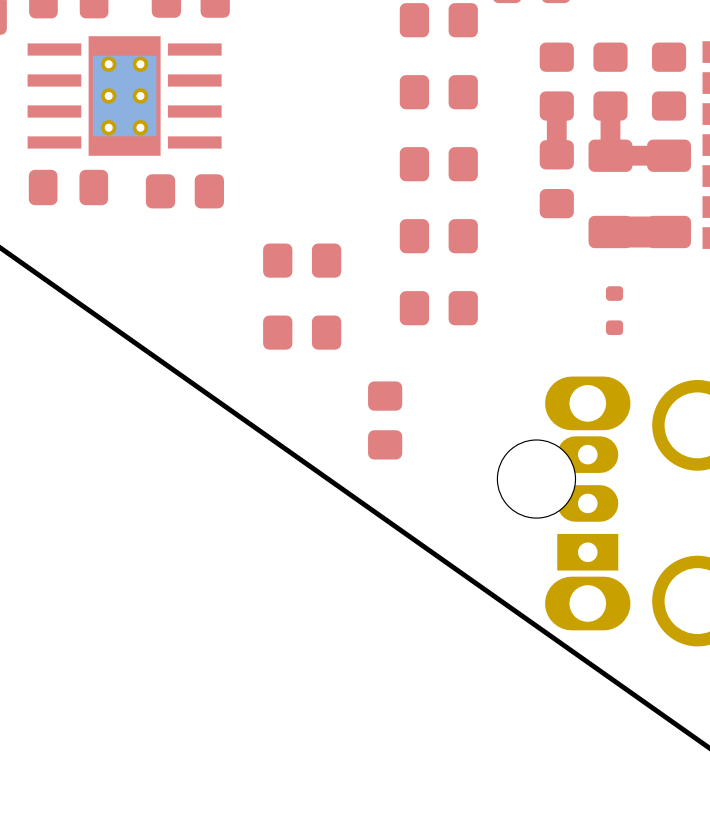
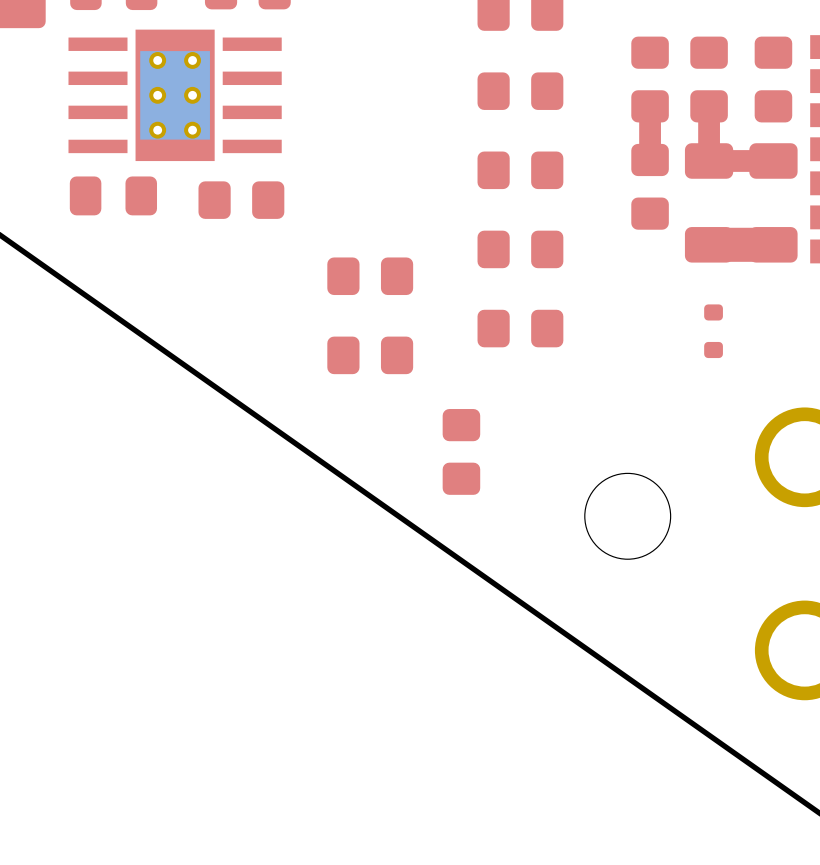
part: (587, 503) -> none

